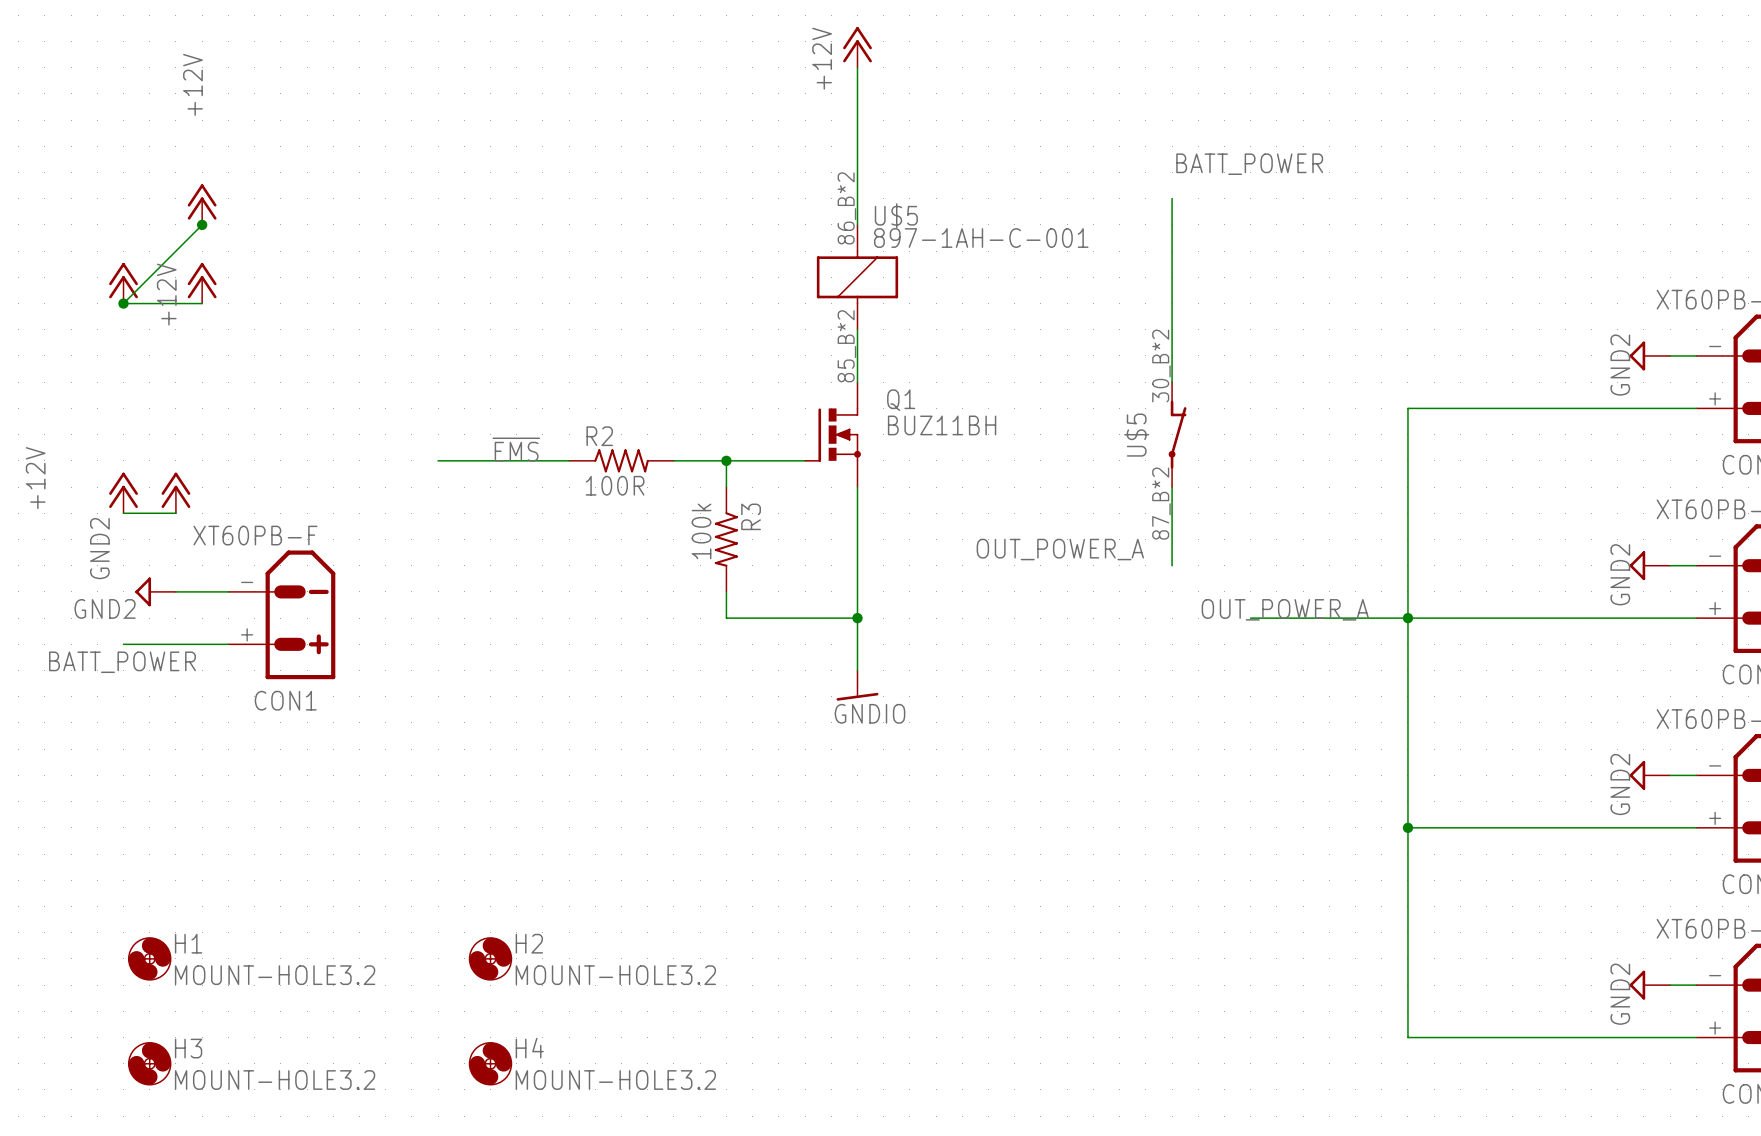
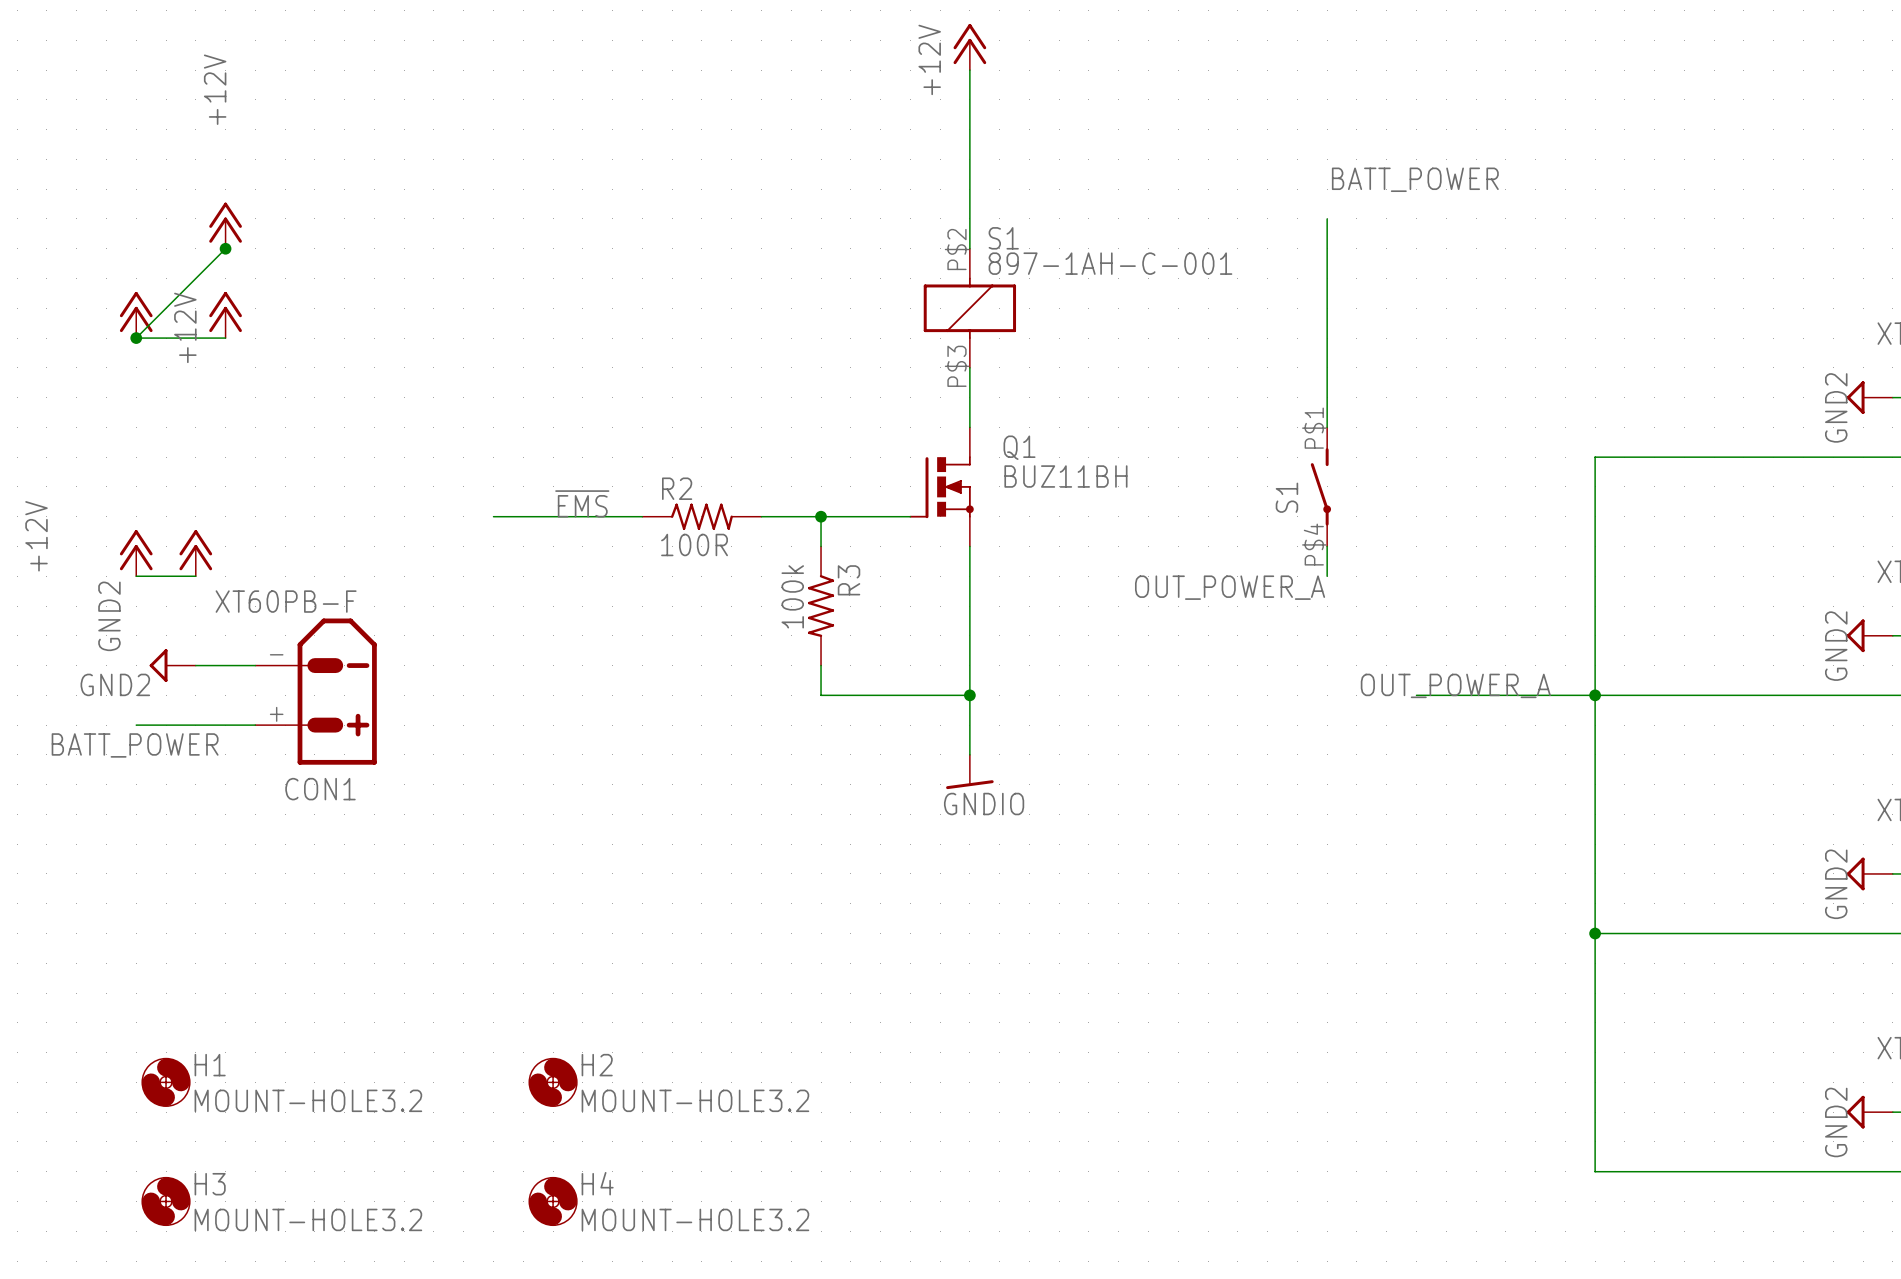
U$5 pin number: 86_B*2 (846, 208) -> P$2 (956, 249)
U$5 name: U$5 (896, 215) -> S1 (1003, 238)
U$5 pin number: 85_B*2 (846, 346) -> P$3 (956, 366)
S1: none -> (1320, 486)
U$5: (1177, 434) -> none
wire: (1172, 513) (1172, 565) -> none
label position: OUT_POWER_A (1060, 549) -> OUT_POWER_A (1230, 587)

